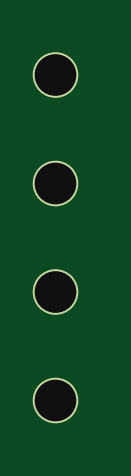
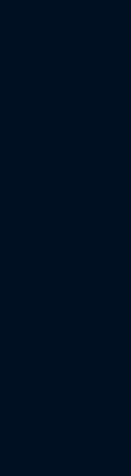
part: (55, 75) -> none
part: (55, 183) -> none
part: (55, 292) -> none
part: (55, 400) -> none

